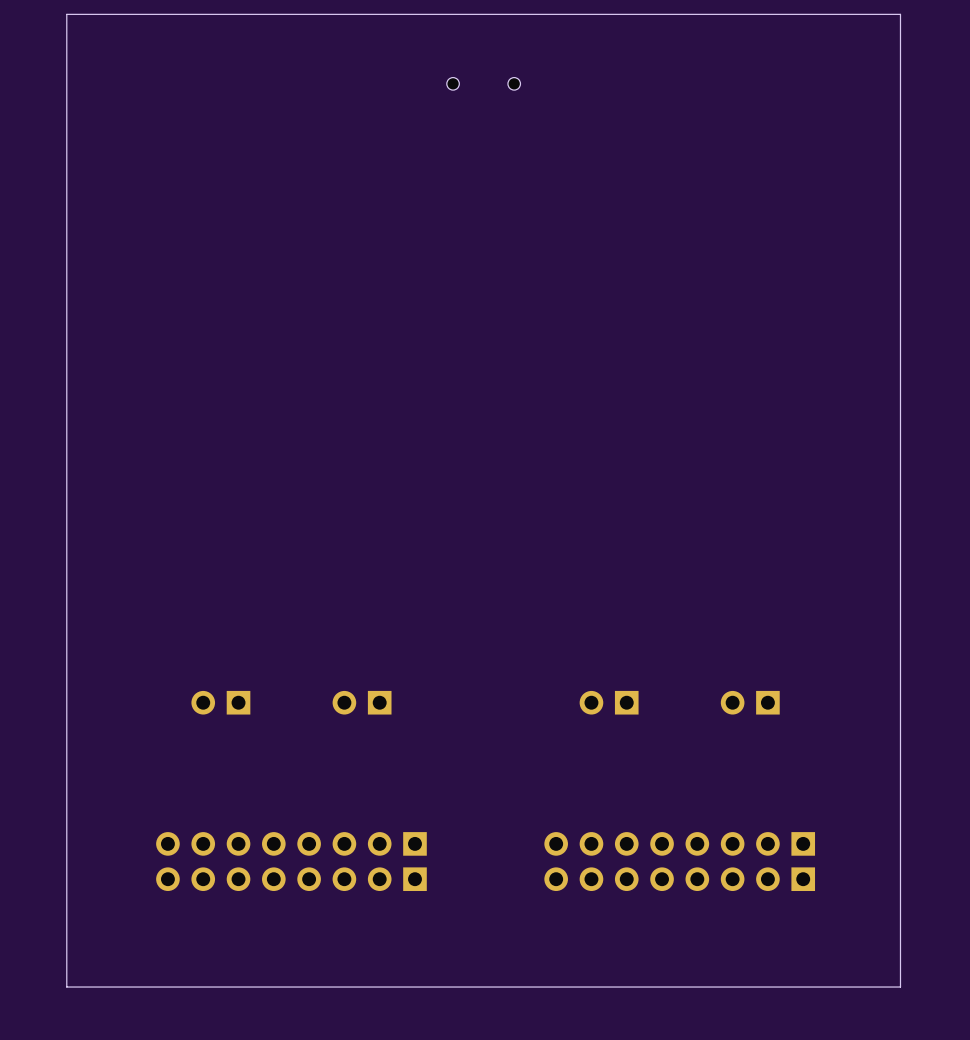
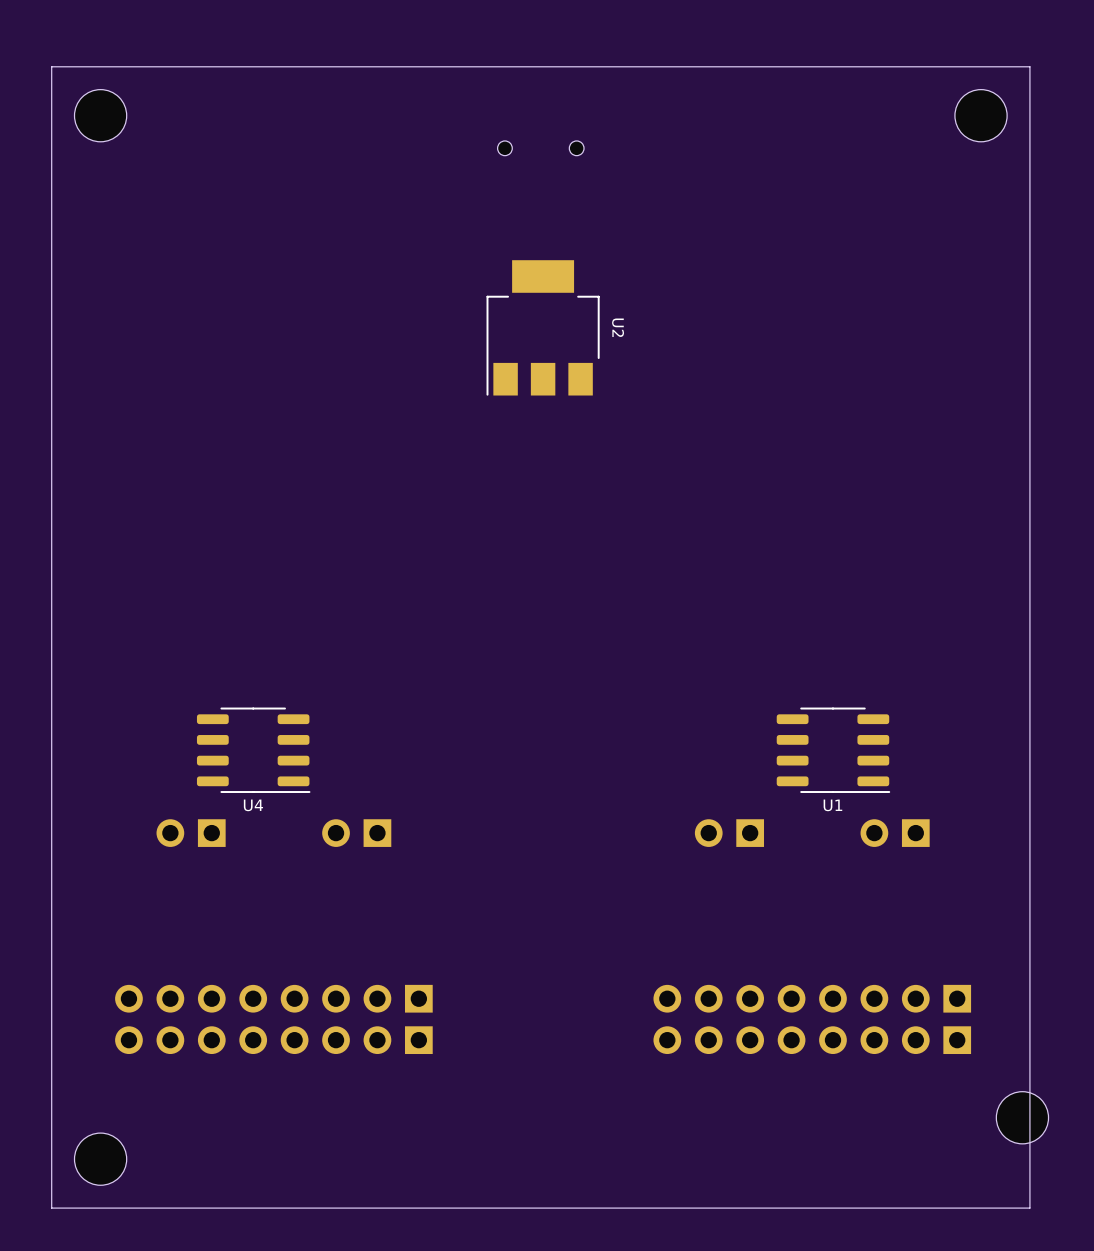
part: none -> (100, 115)
part: none -> (981, 115)
U2: none -> (543, 327)
U4: none -> (253, 750)
U1: none -> (833, 750)
part position: (220, 702) -> (191, 833)
part position: (362, 702) -> (356, 833)
part position: (609, 702) -> (729, 833)
part position: (750, 702) -> (895, 833)
part: none -> (273, 998)
part: none -> (812, 998)
part: none -> (273, 1040)
part: (291, 843) -> none
part: (679, 843) -> none
part: none -> (812, 1040)
part: (291, 879) -> none
part: (679, 879) -> none
part: none -> (1022, 1117)
part: none -> (100, 1159)

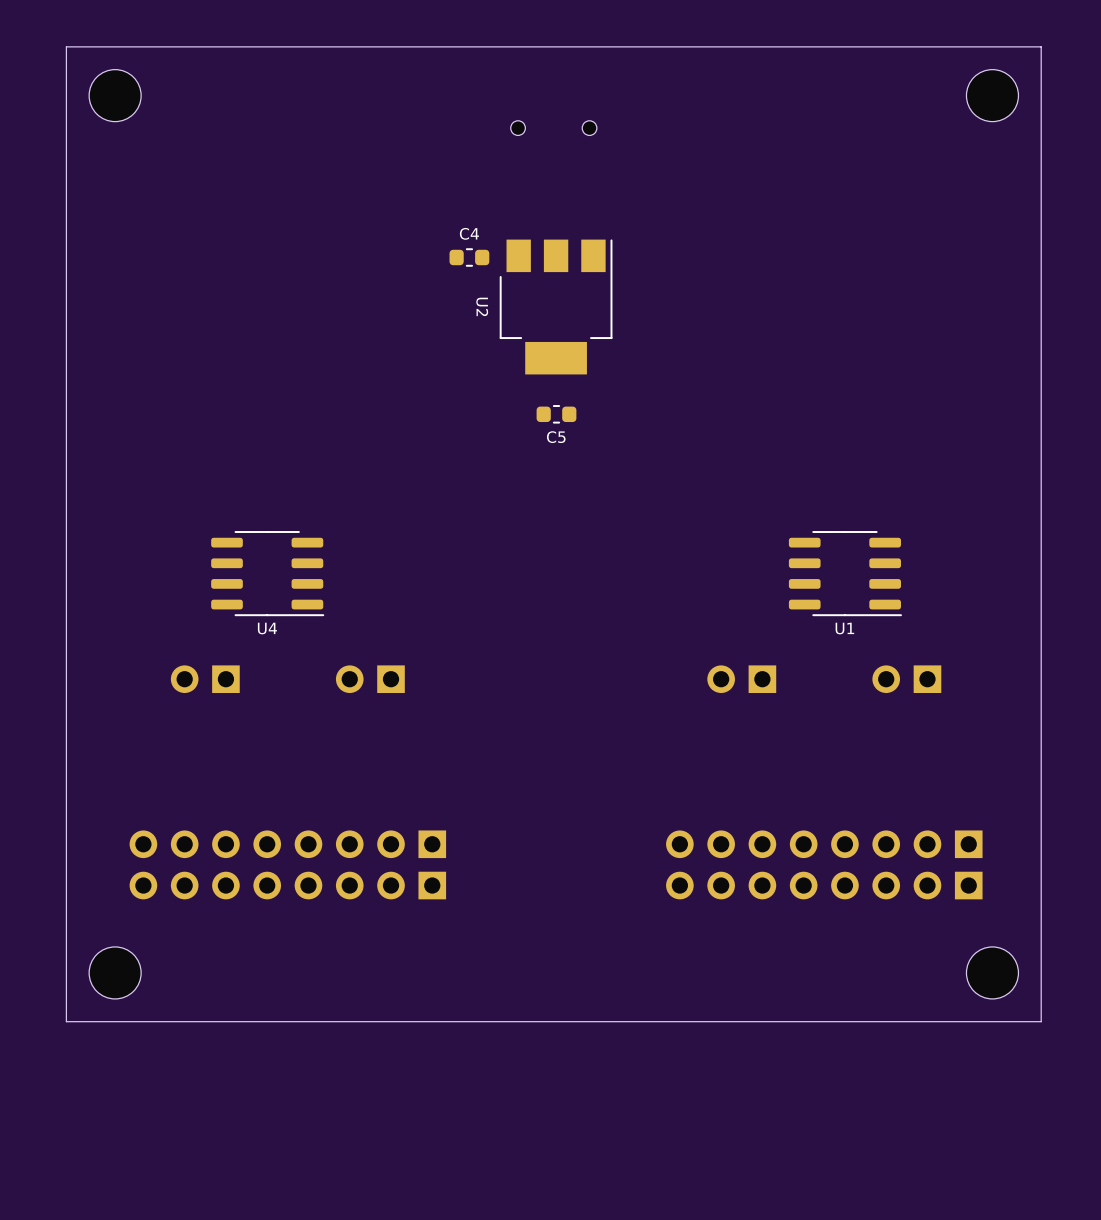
C4: none -> (469, 257)
U2 rotation: 0° (543, 327) -> 180° (556, 306)
C5: none -> (556, 414)
part: none -> (205, 679)
part: none -> (370, 679)
part: none -> (741, 679)
part: none -> (906, 679)
U4 position: (253, 750) -> (267, 573)
U1 position: (833, 750) -> (845, 573)
part: (191, 833) -> none
part: (356, 833) -> none
part: (729, 833) -> none
part: (895, 833) -> none
part: none -> (287, 844)
part: none -> (824, 844)
part: none -> (287, 885)
part: none -> (824, 885)
part: (273, 998) -> none
part: (812, 998) -> none
part: (273, 1040) -> none
part: (812, 1040) -> none
board edge: (1029, 1045) (1029, 1208) (51, 1208) (51, 1045) -> (1041, 1021) (66, 1021)
part position: (1022, 1117) -> (992, 972)
part position: (100, 1159) -> (115, 972)

